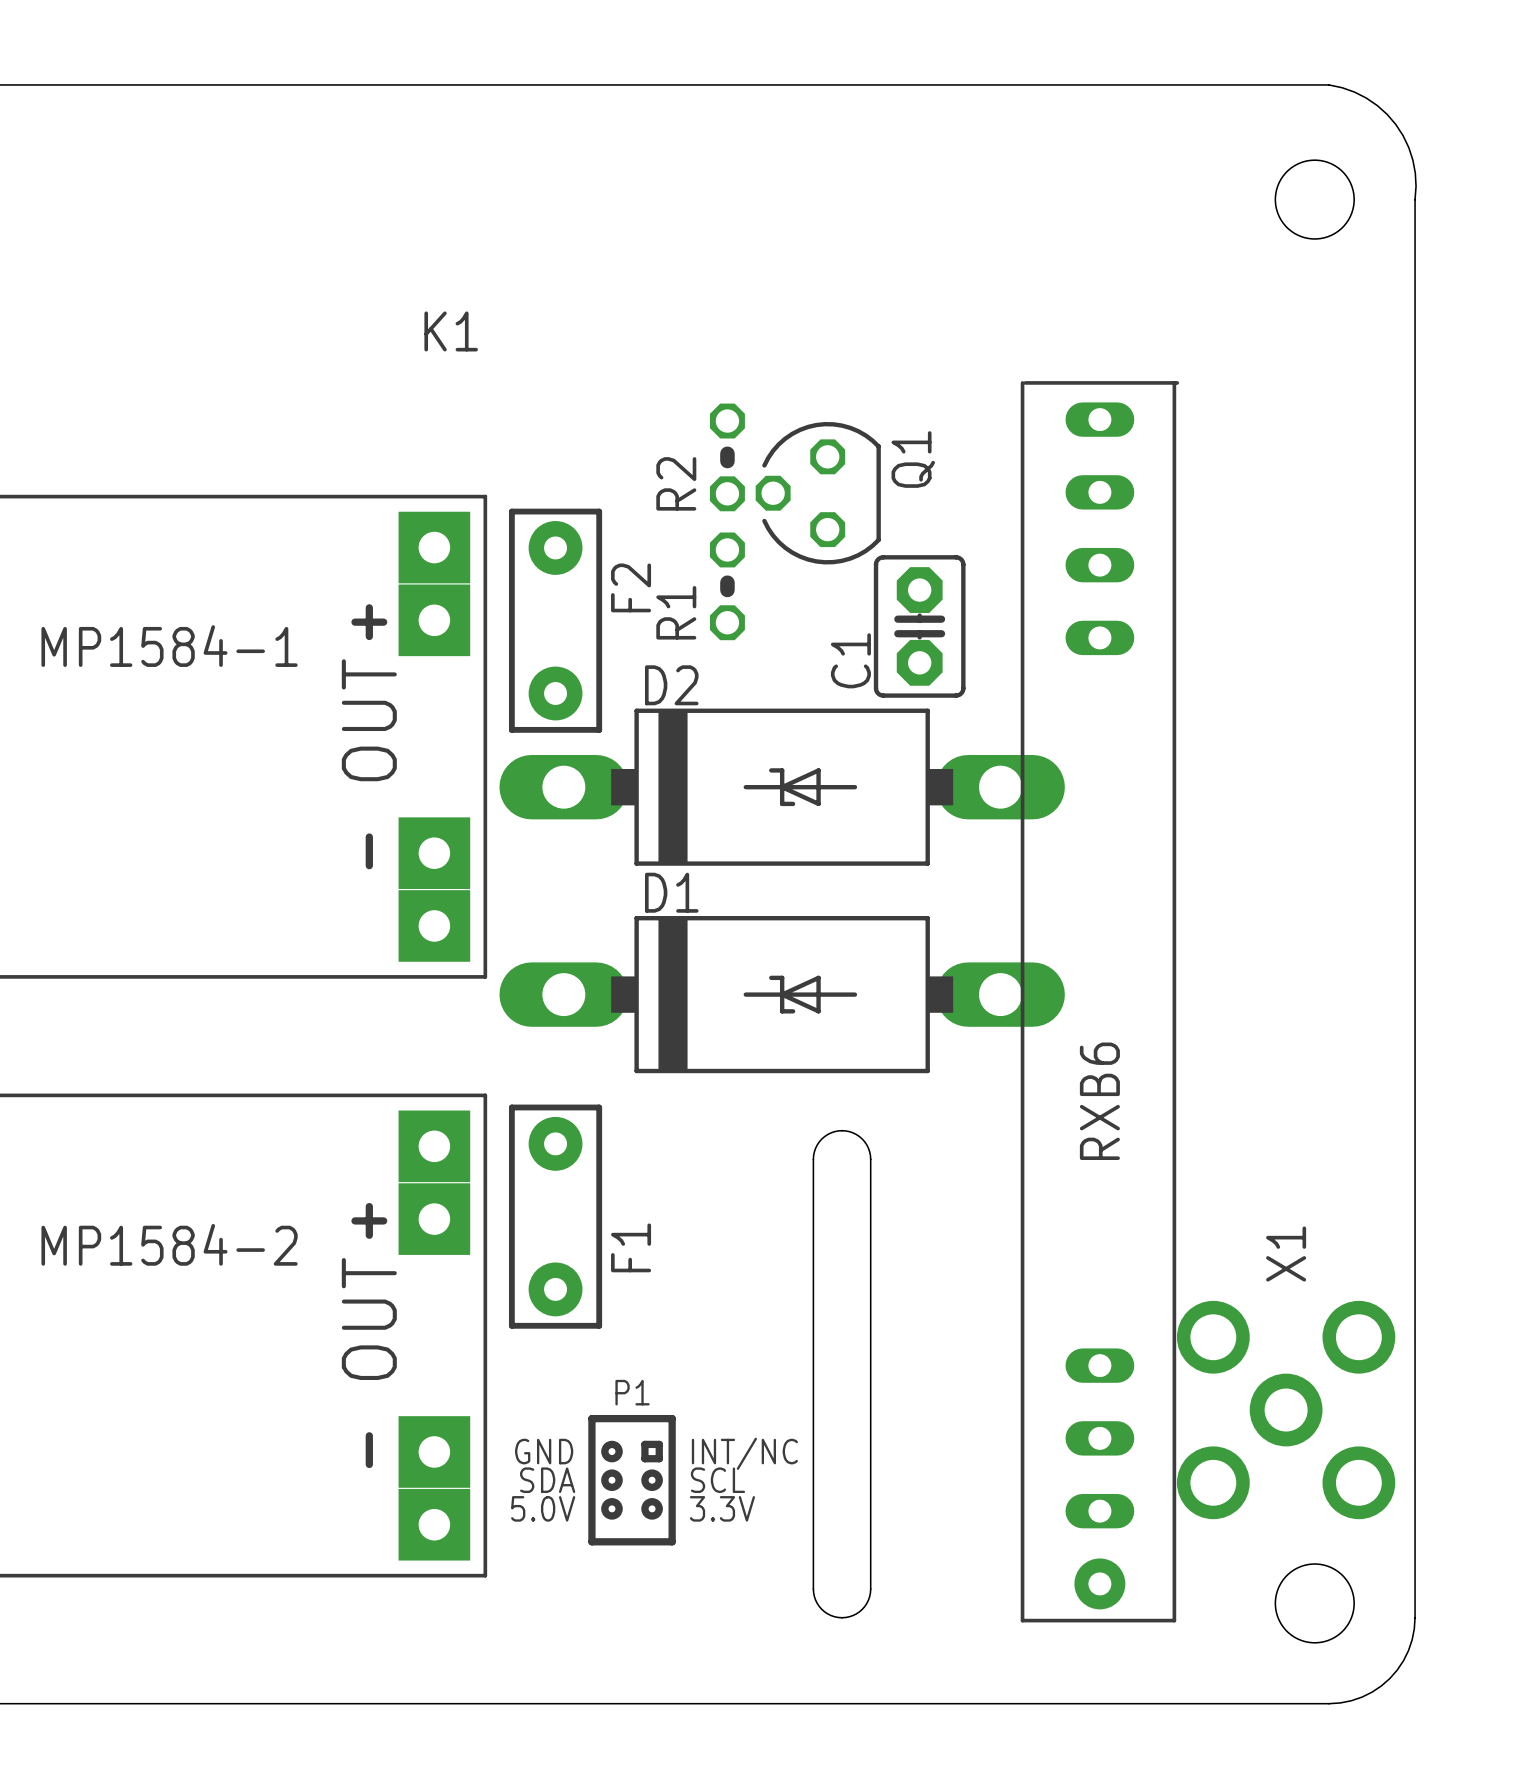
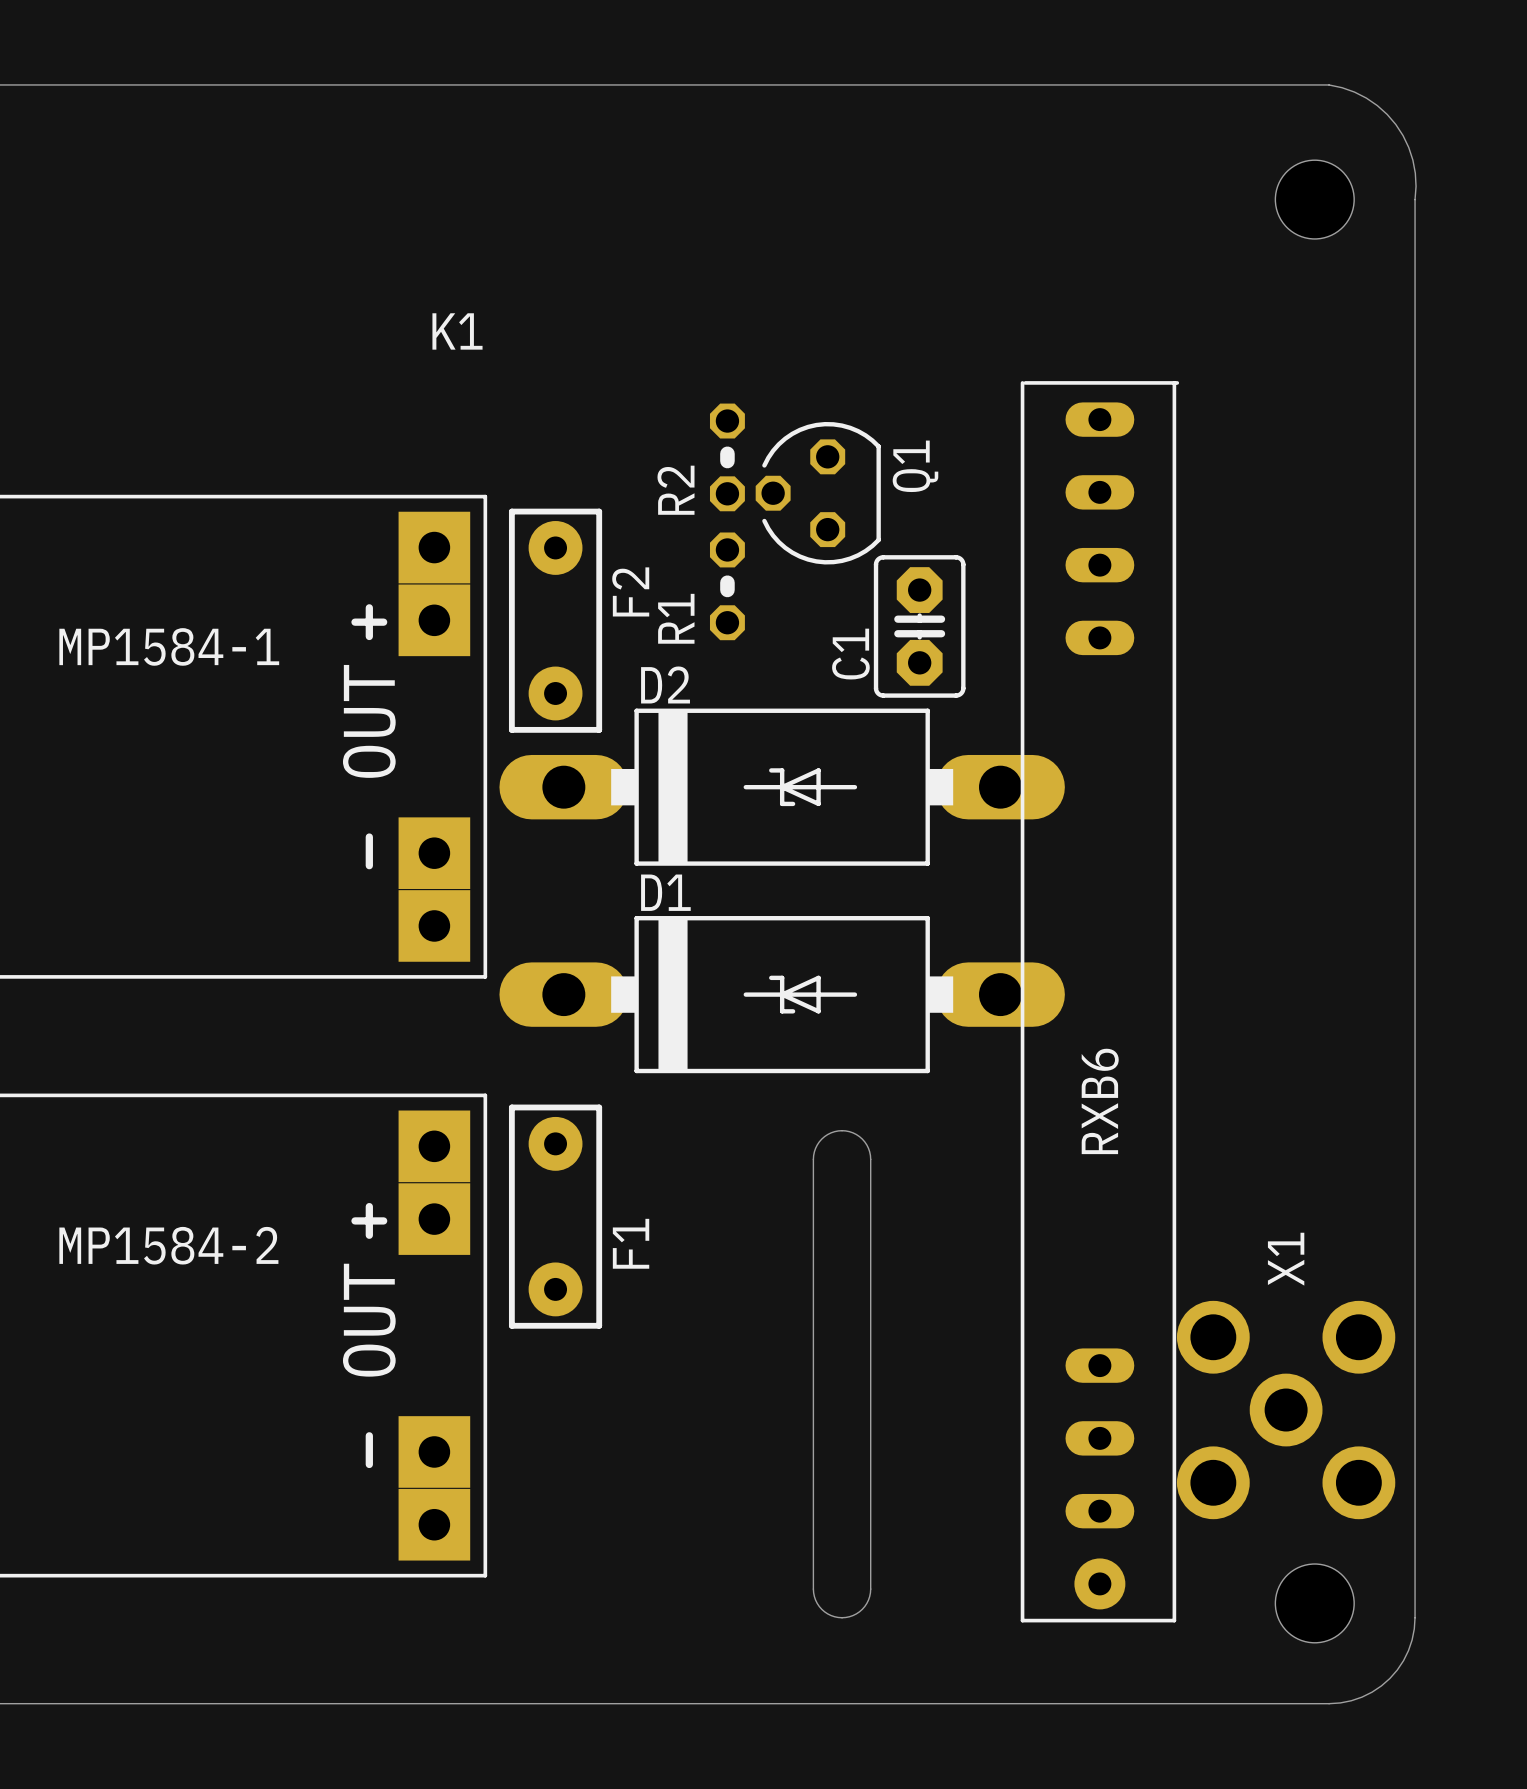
text: P1 (632, 1392) -> none
line: (591, 1418) (591, 1541) (672, 1541) (672, 1418) (591, 1418) -> none
drawing: [601, 1440, 663, 1520] -> none
line: (644, 1444) (644, 1458) (659, 1458) (659, 1444) (644, 1444) -> none
text: GND (544, 1451) -> none
text: INT/NC (744, 1453) -> none
text: SDA (547, 1480) -> none
text: SCL (717, 1480) -> none
text: 5.0V (543, 1508) -> none
text: 3.3V (722, 1508) -> none

